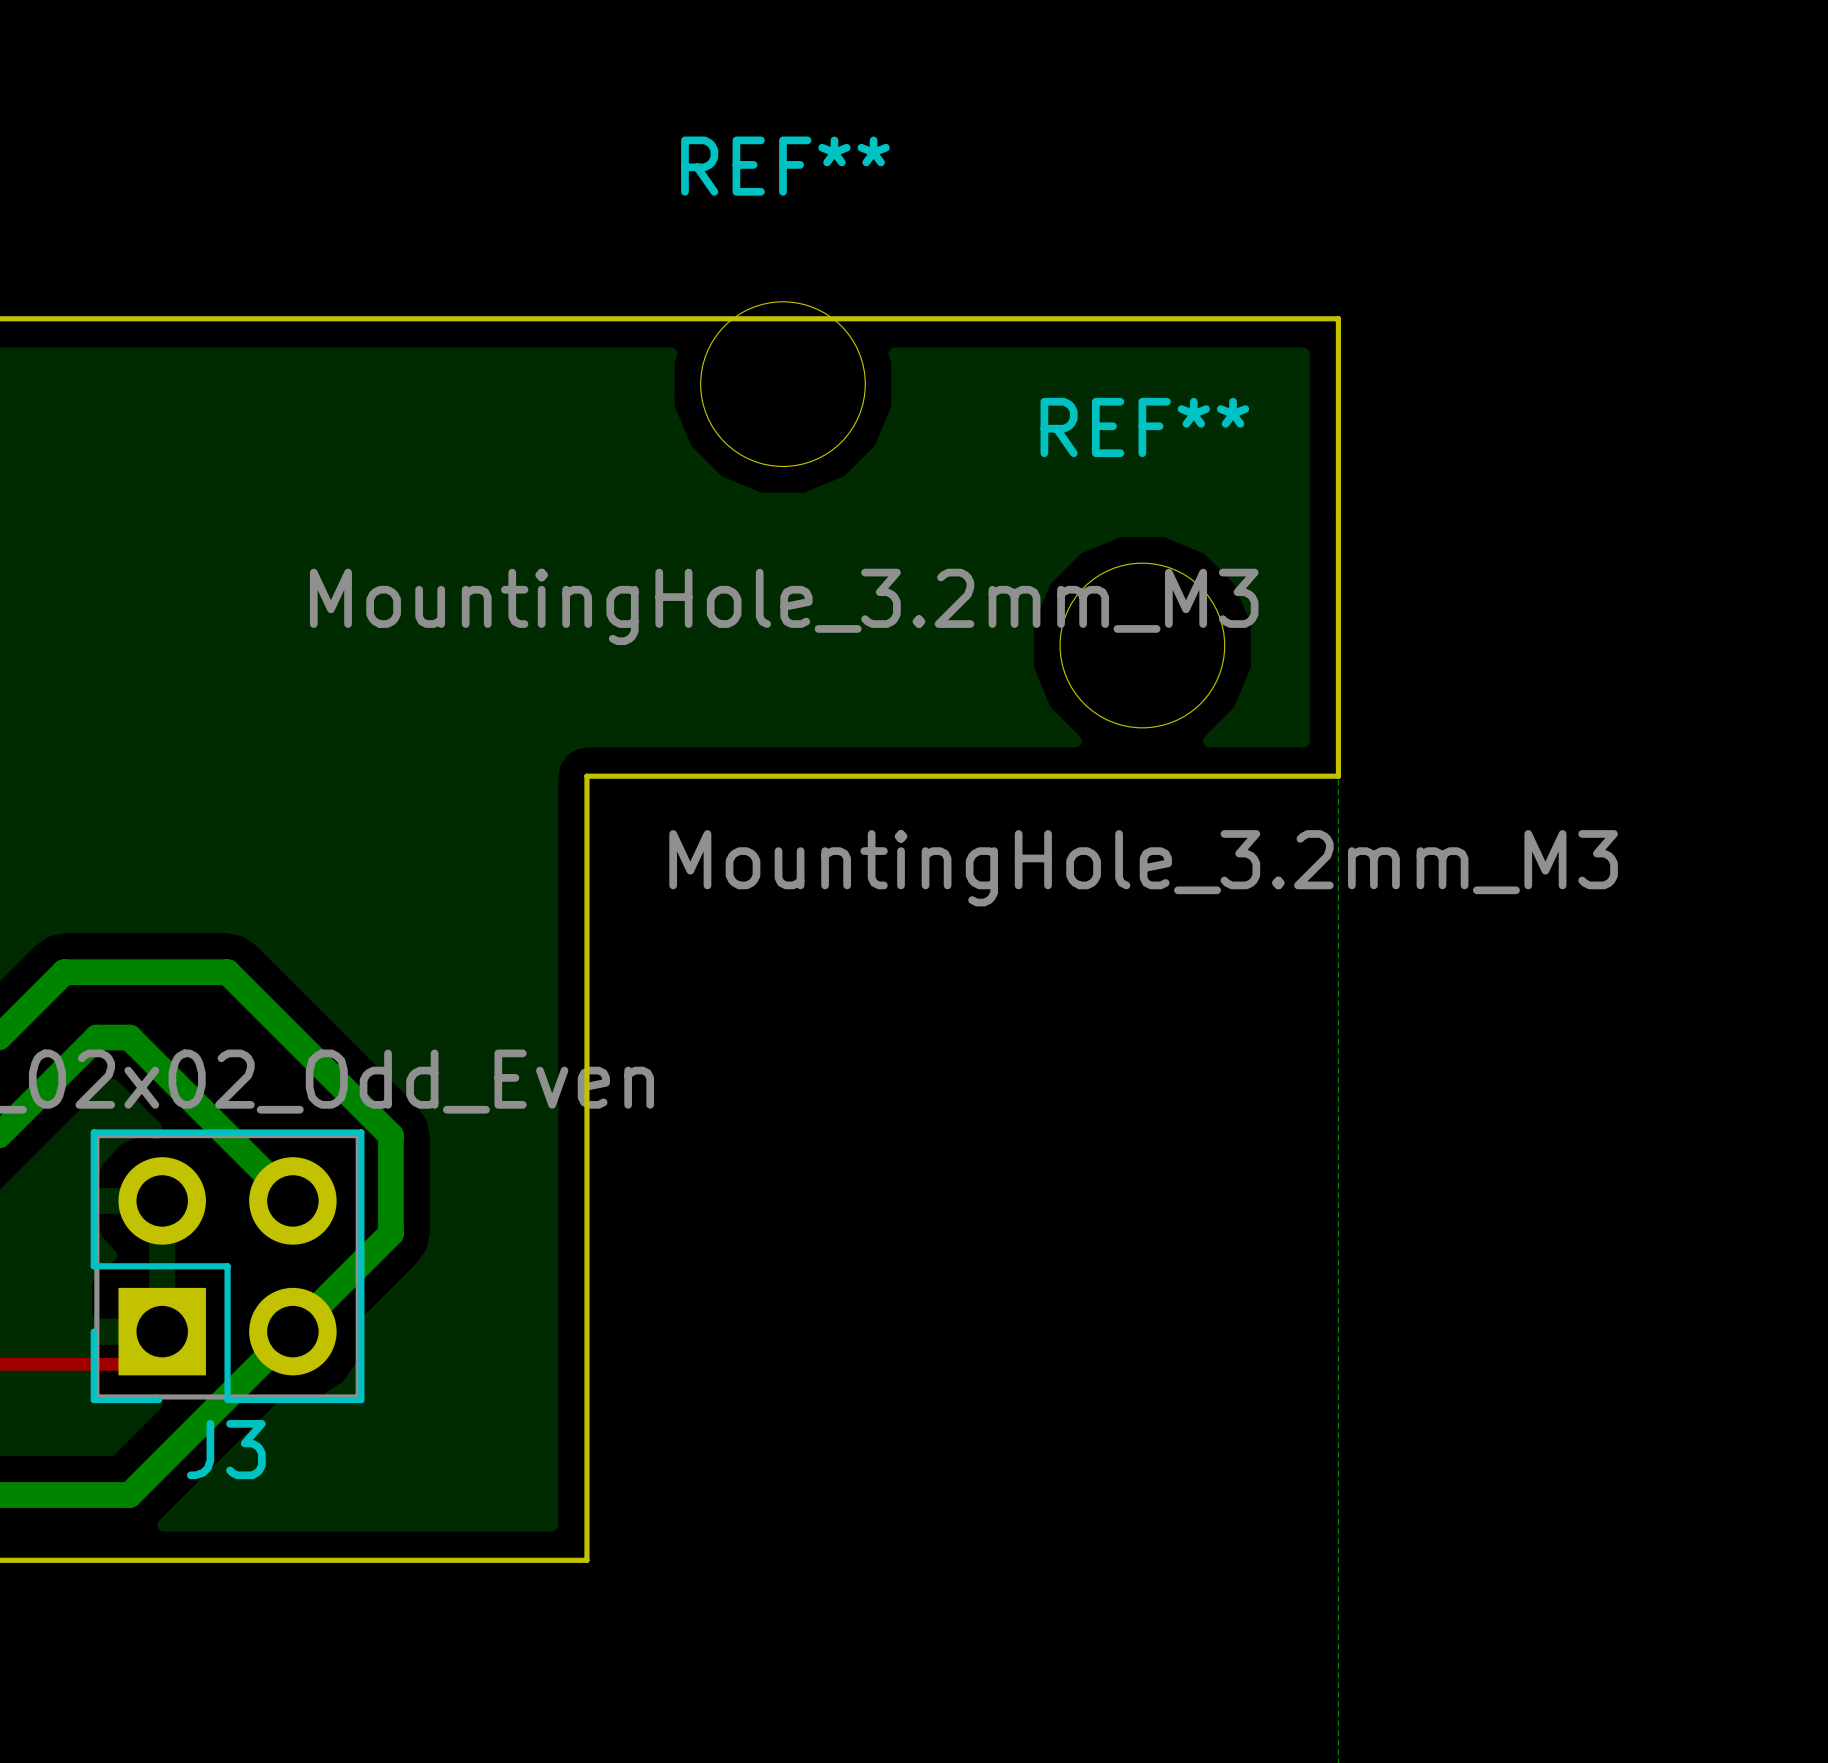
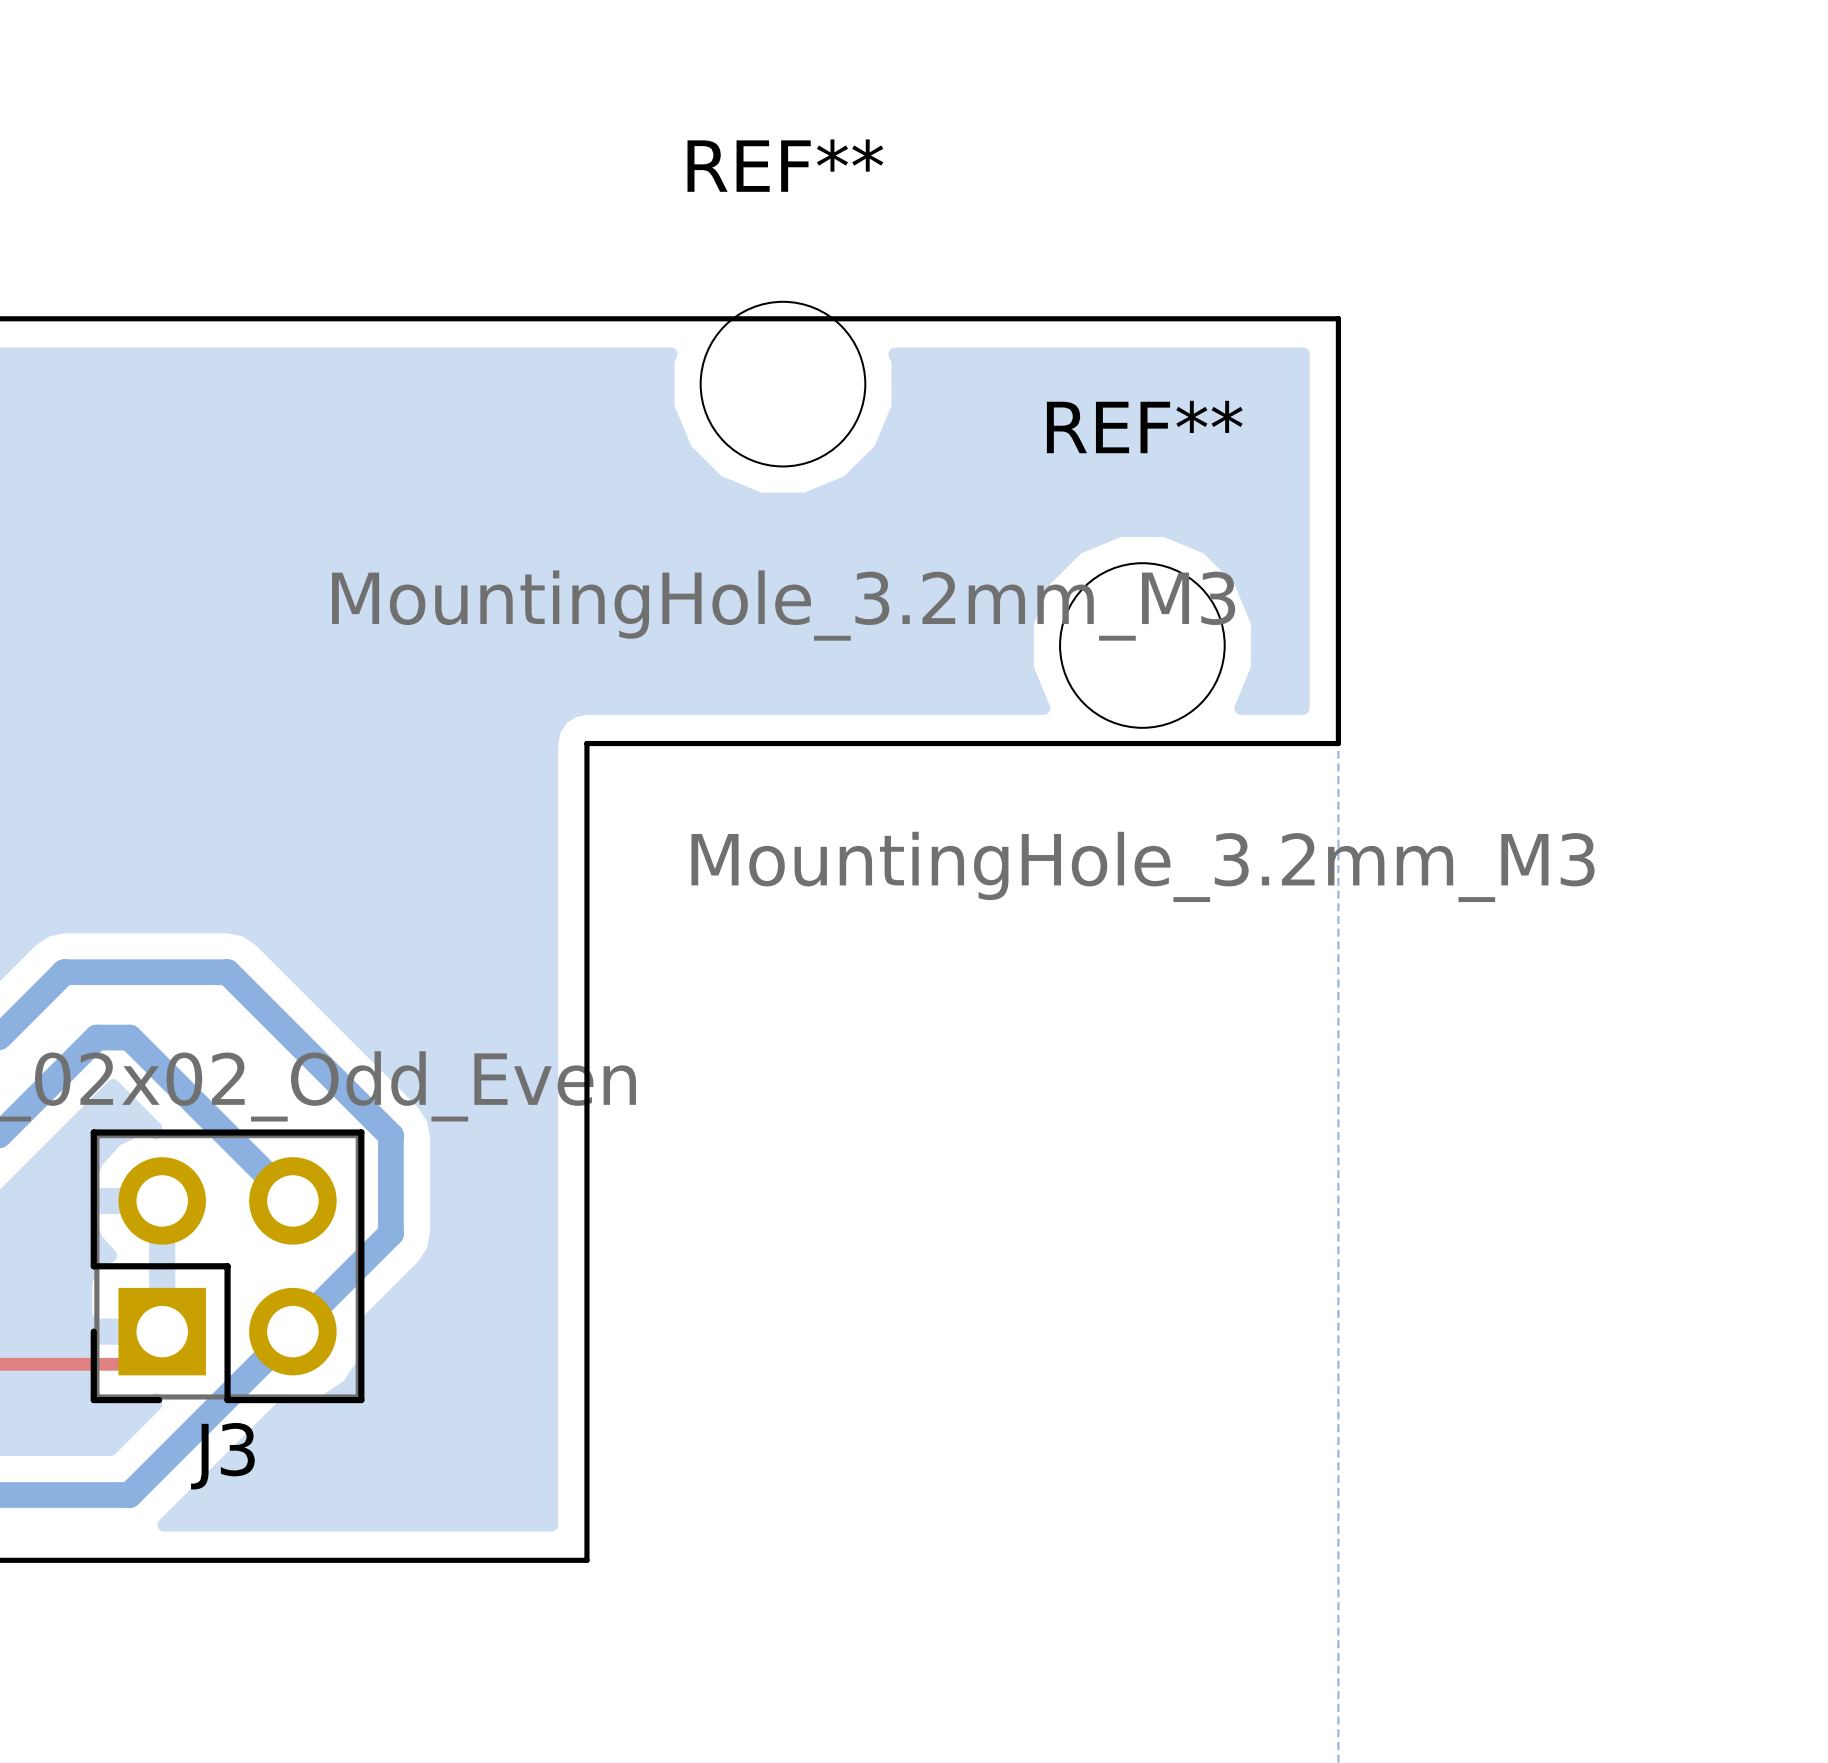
board edge: (1338, 743) (1338, 776) (586, 776) -> (1338, 743) (586, 743) (586, 776)

